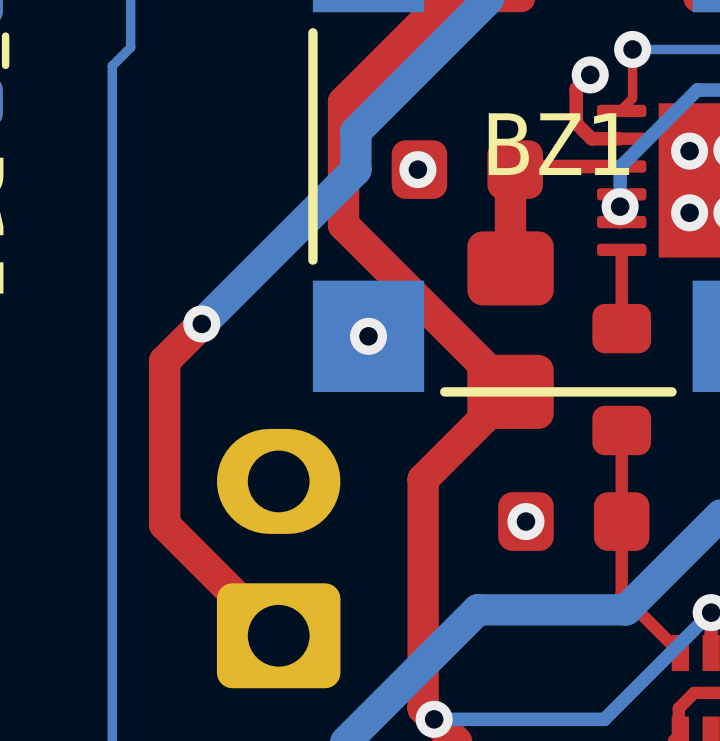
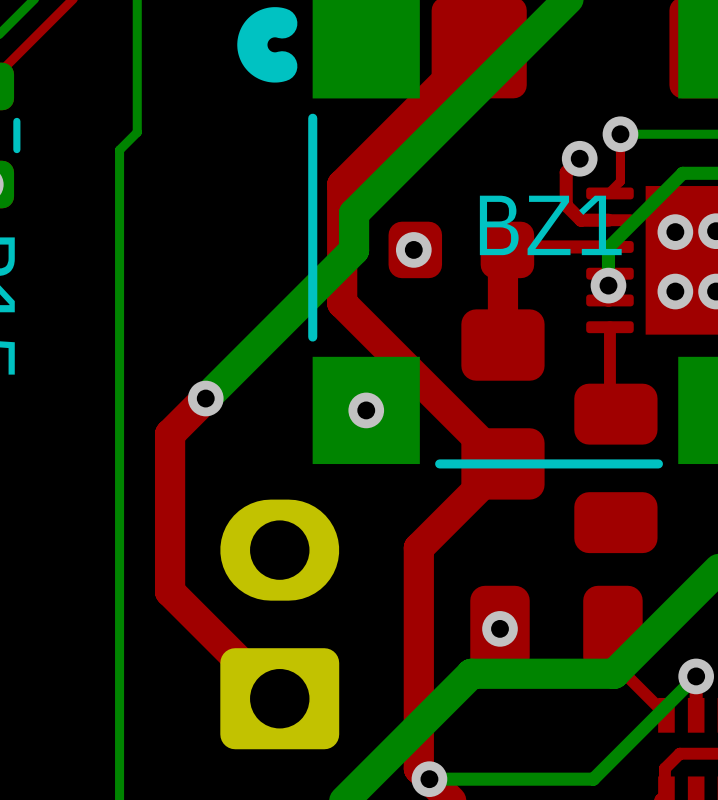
part footprint: [592, 303, 652, 456] -> [574, 383, 658, 554]
top track: (621, 430) (621, 594) (624, 597) -> none
part footprint: [498, 492, 650, 551] -> [470, 585, 643, 672]
via position: (525, 521) -> (500, 628)

